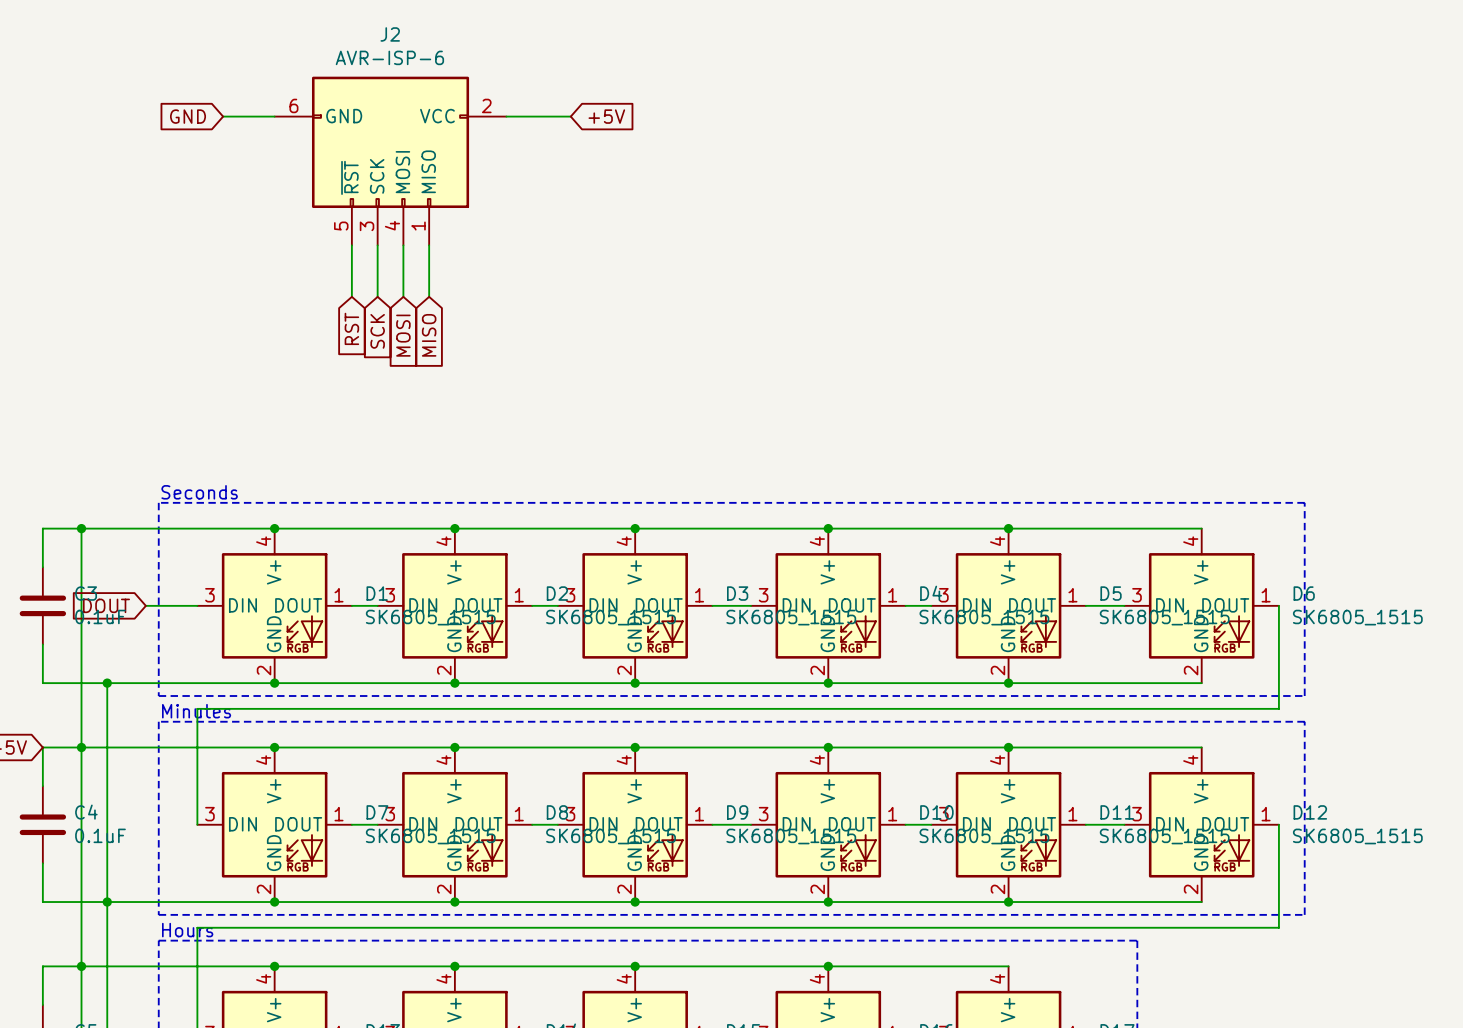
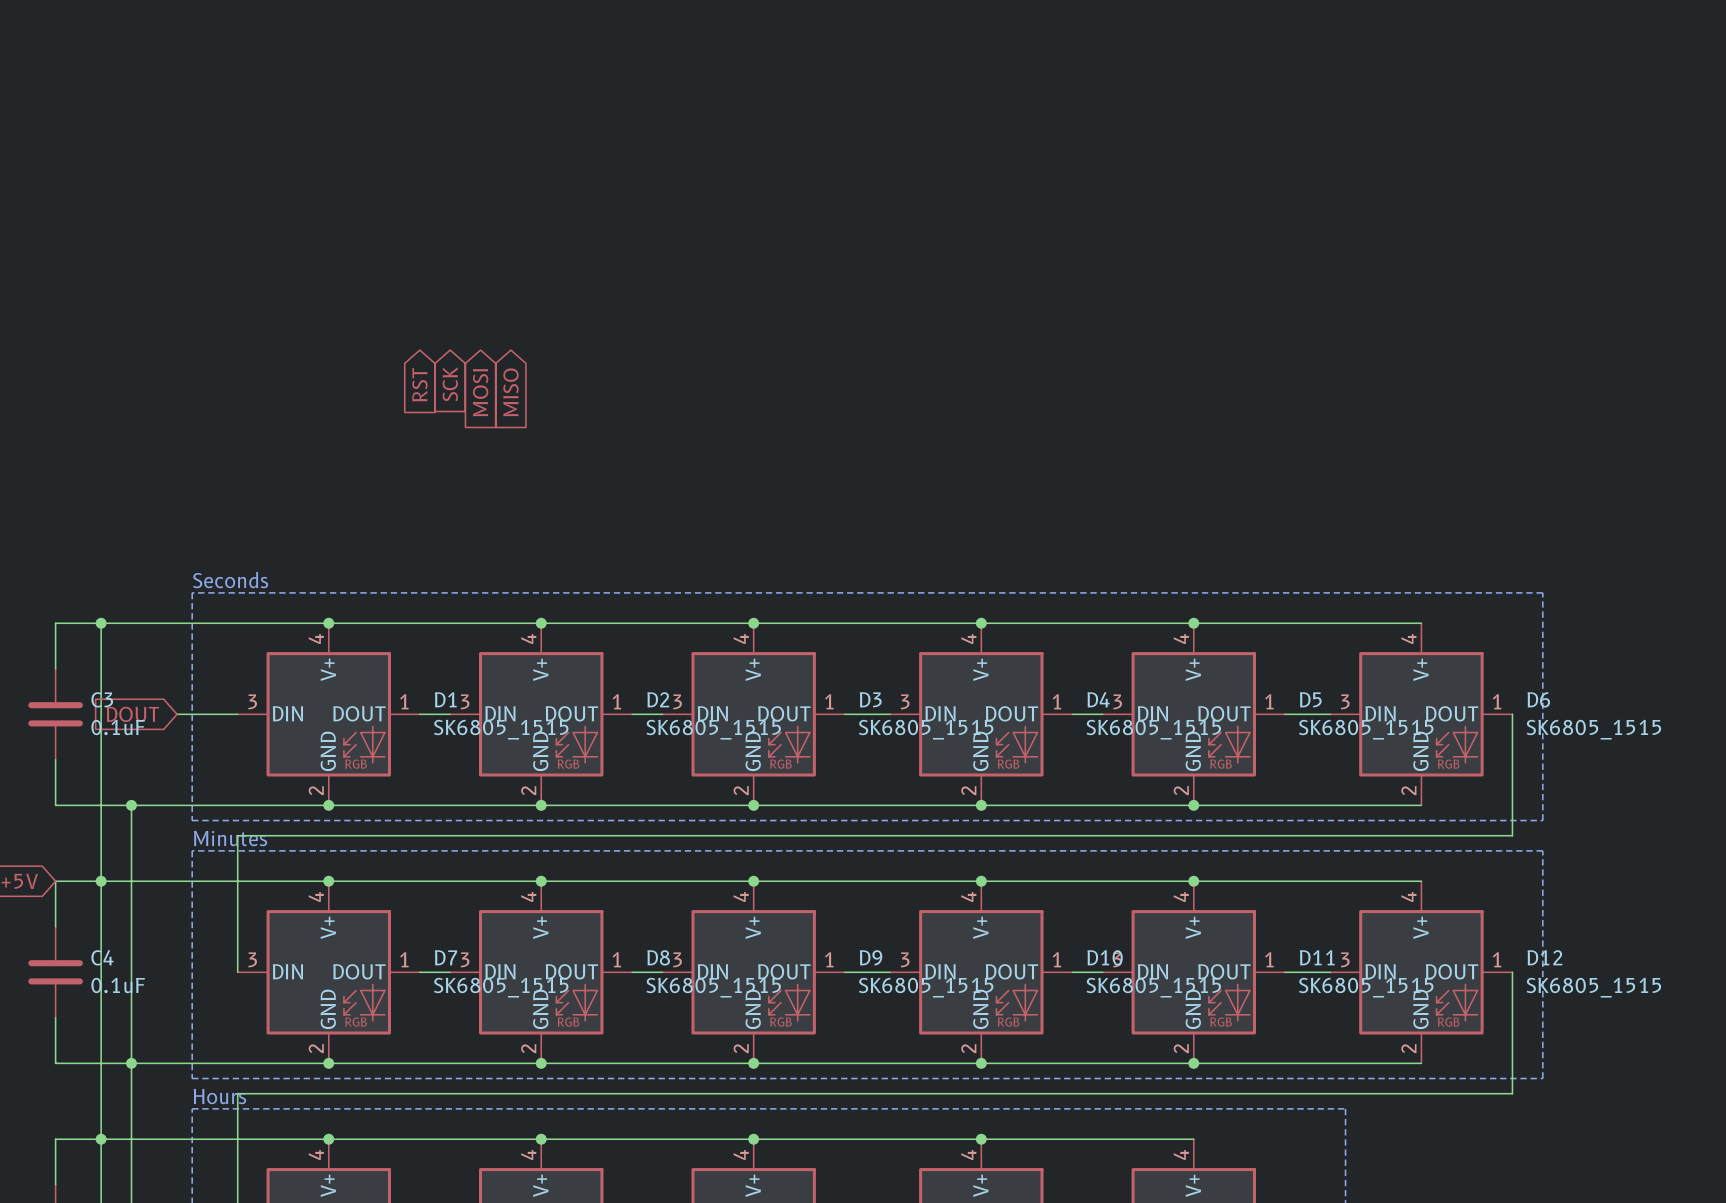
global label: GND (188, 116) -> none
wire: (223, 116) (274, 116) -> none
wire: (506, 116) (570, 116) -> none
global label: +5V (606, 116) -> none
J2: AVR-ISP-6 (390, 161) -> none
wire: (351, 245) (351, 296) -> none
wire: (377, 245) (377, 296) -> none
wire: (403, 245) (403, 296) -> none
wire: (429, 245) (429, 296) -> none

